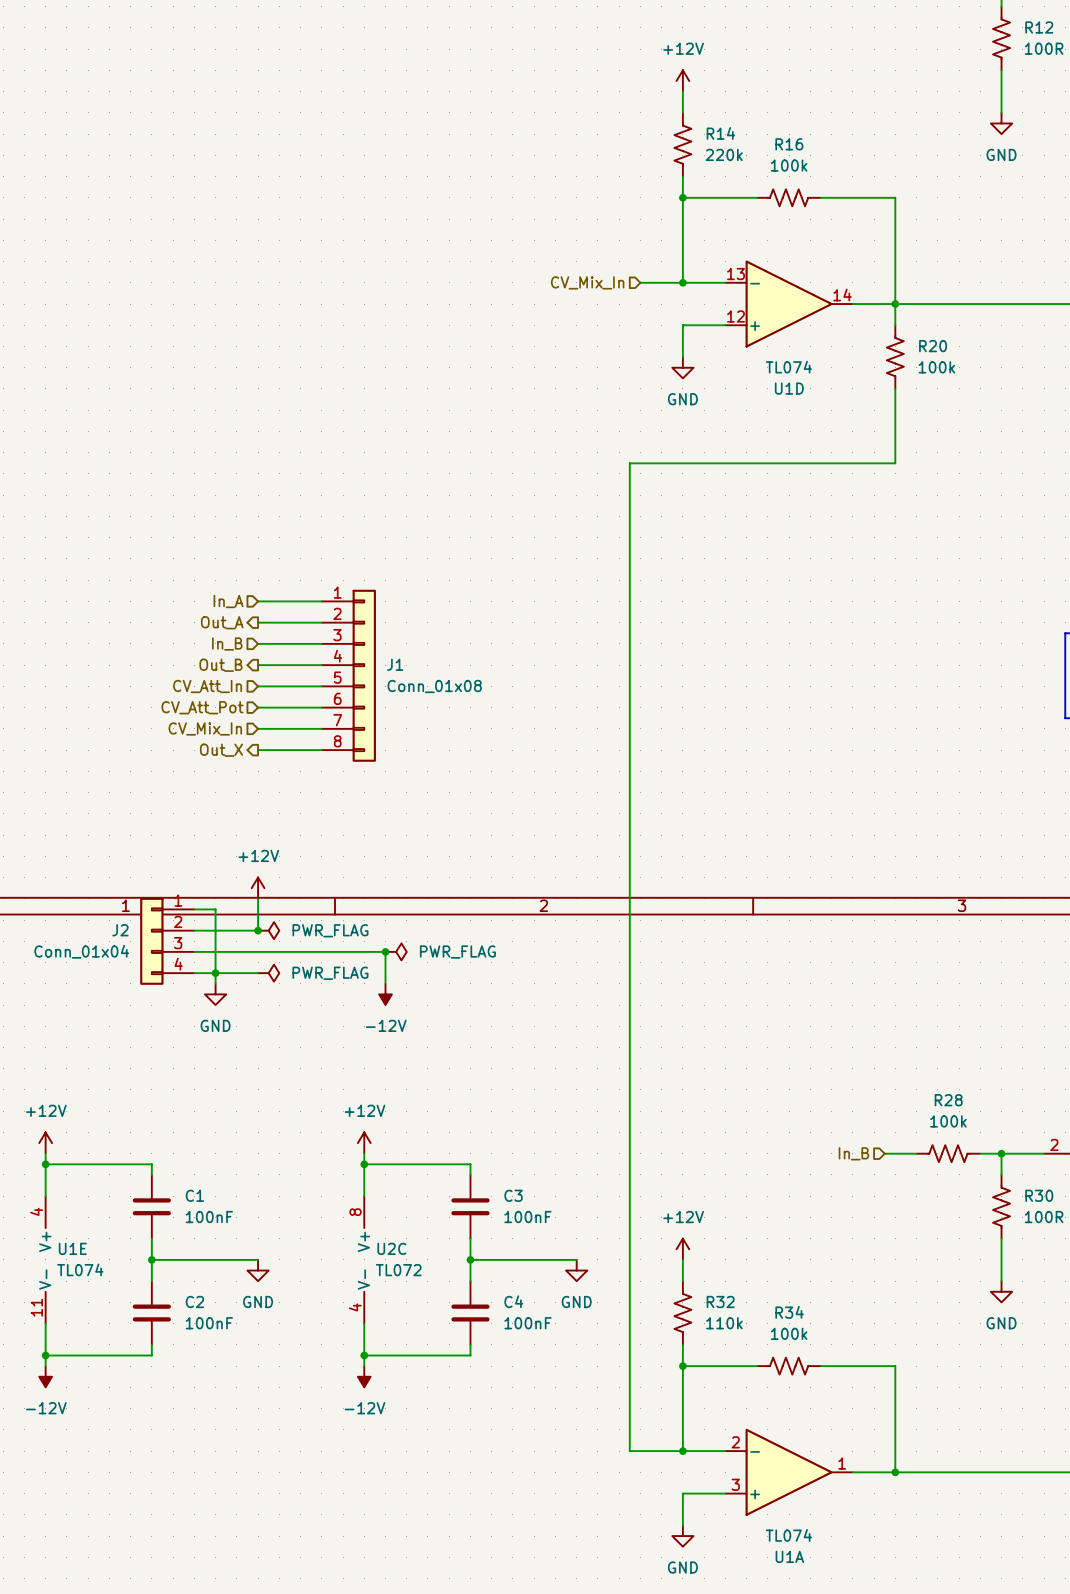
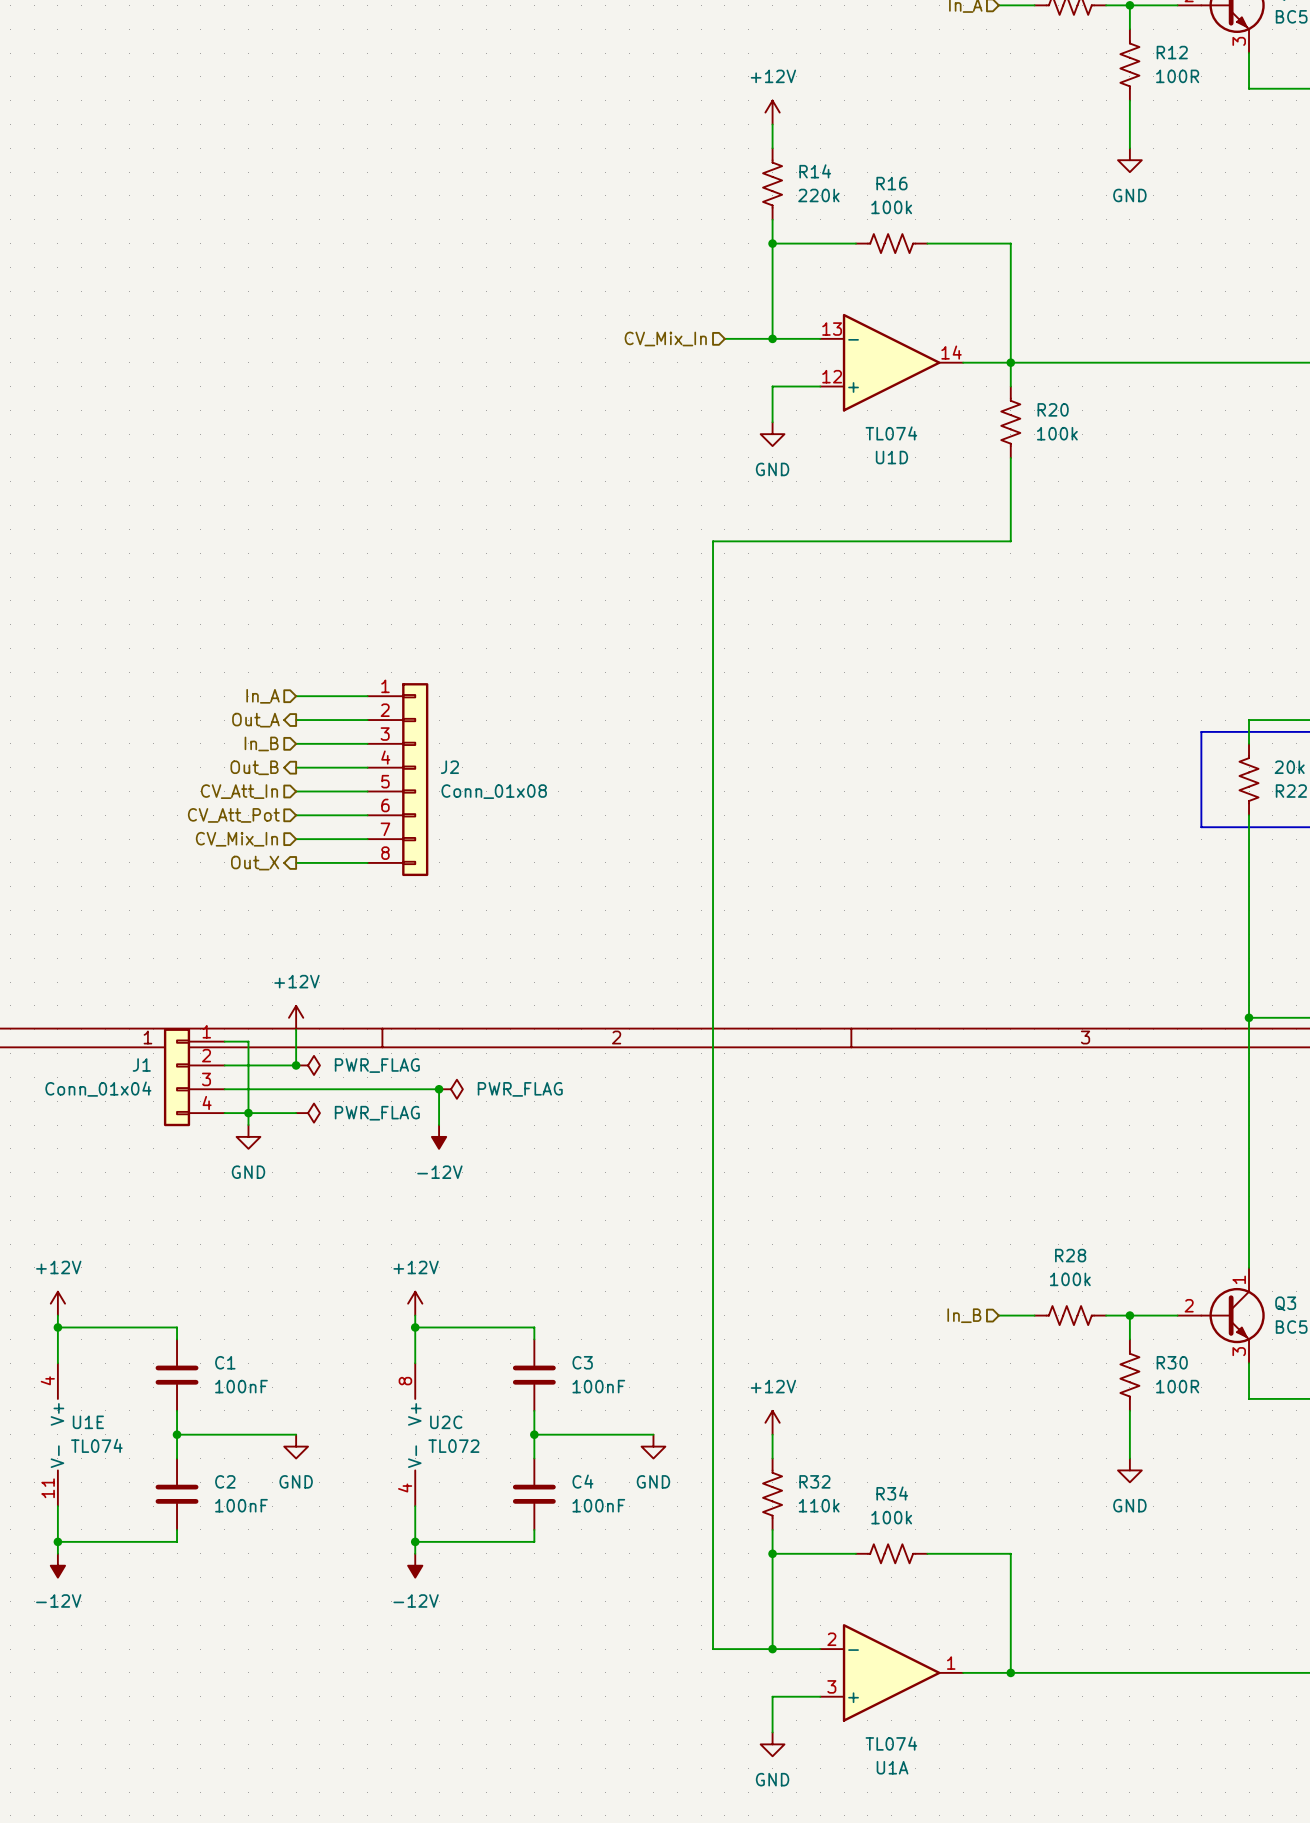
J1 name: J1 (395, 664) -> J2 (449, 767)
J2 name: J2 (120, 930) -> J1 (141, 1064)

